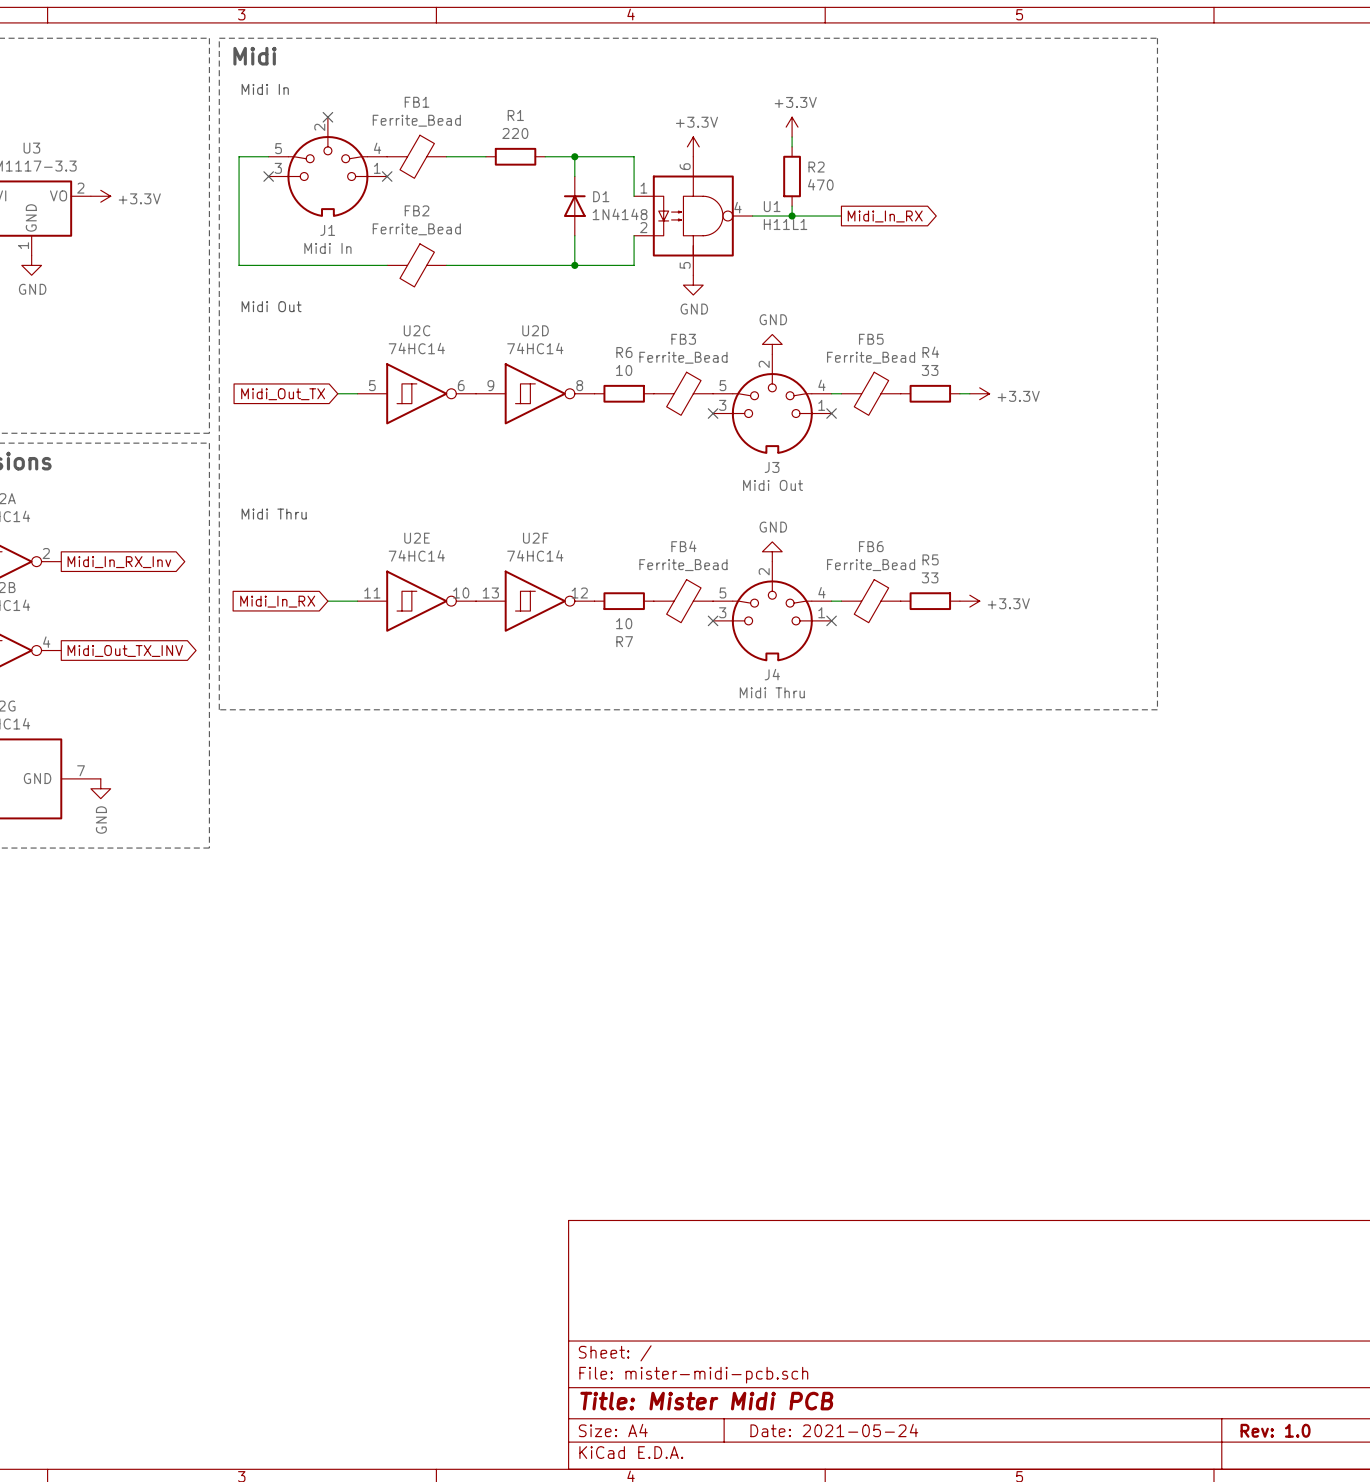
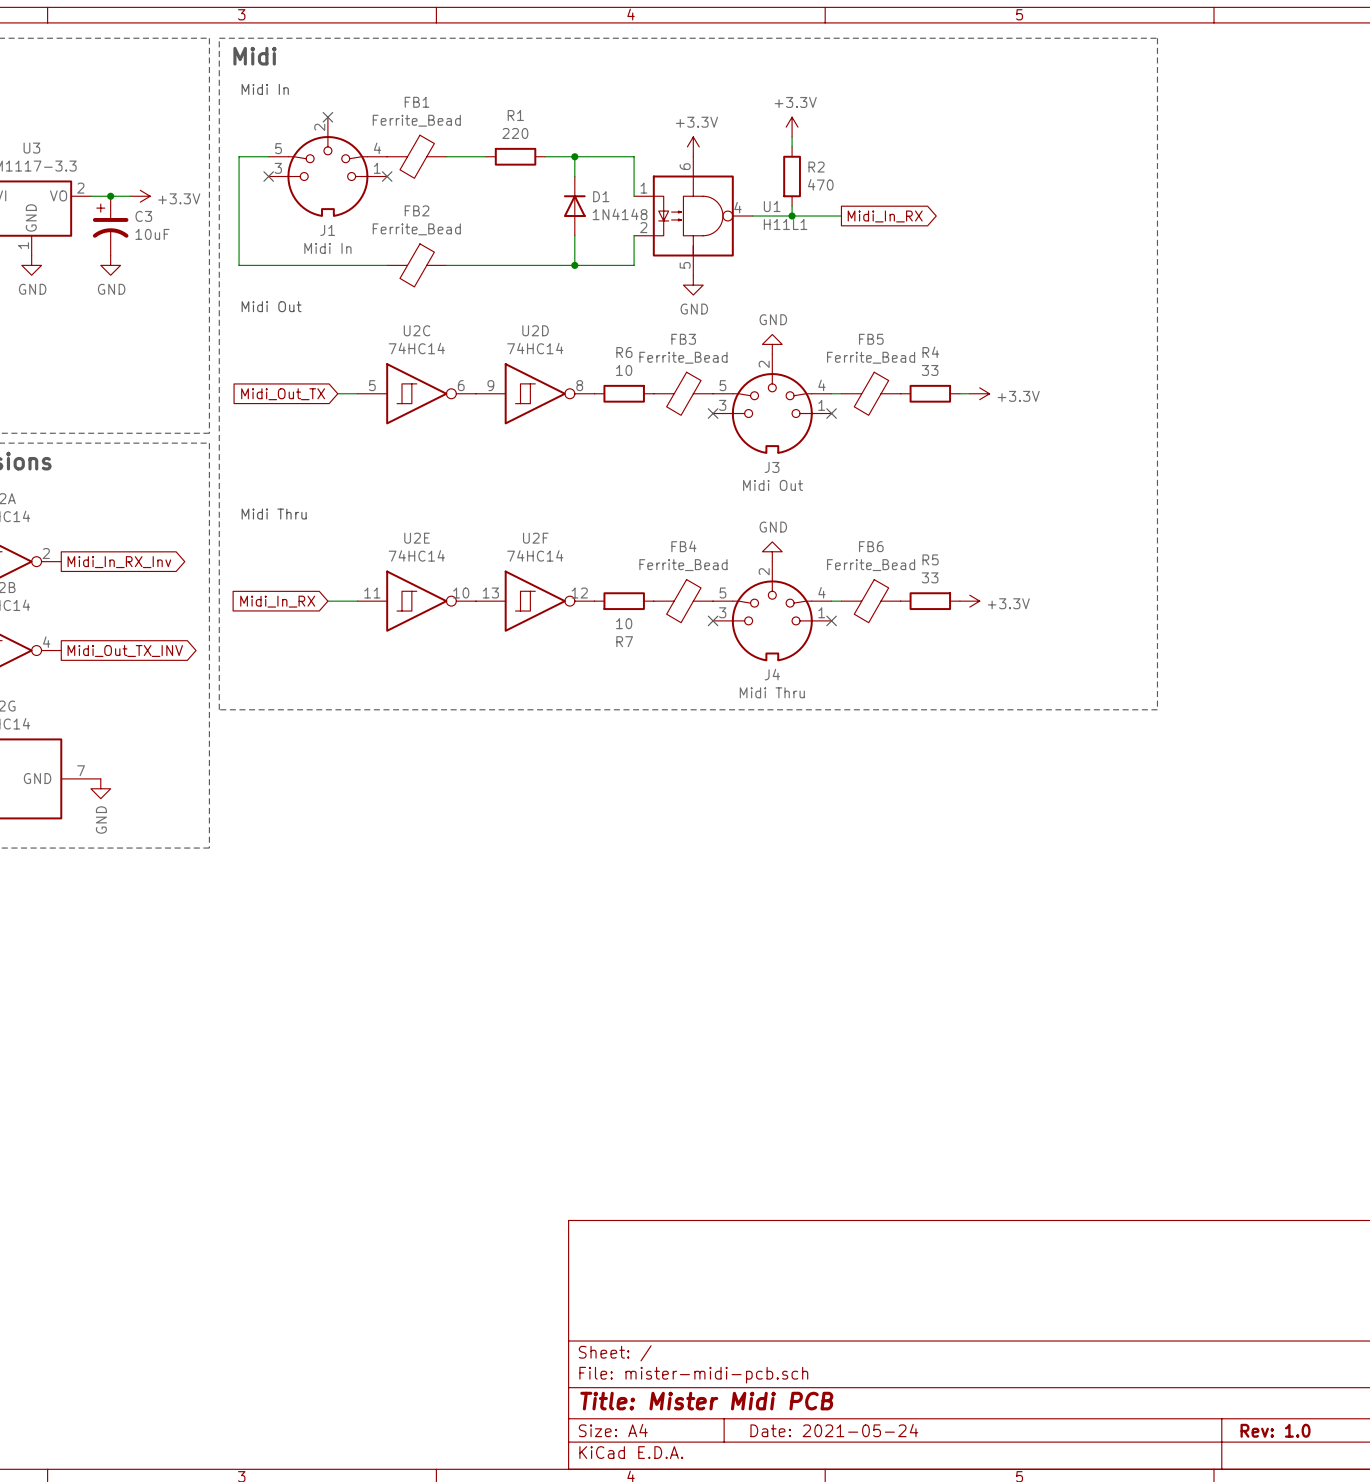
power symbol position: +3.3V (100, 196) -> +3.3V (140, 196)
junction: none -> (110, 196)
C3: none -> 10uF (110, 225)
power symbol: none -> GND (110, 265)

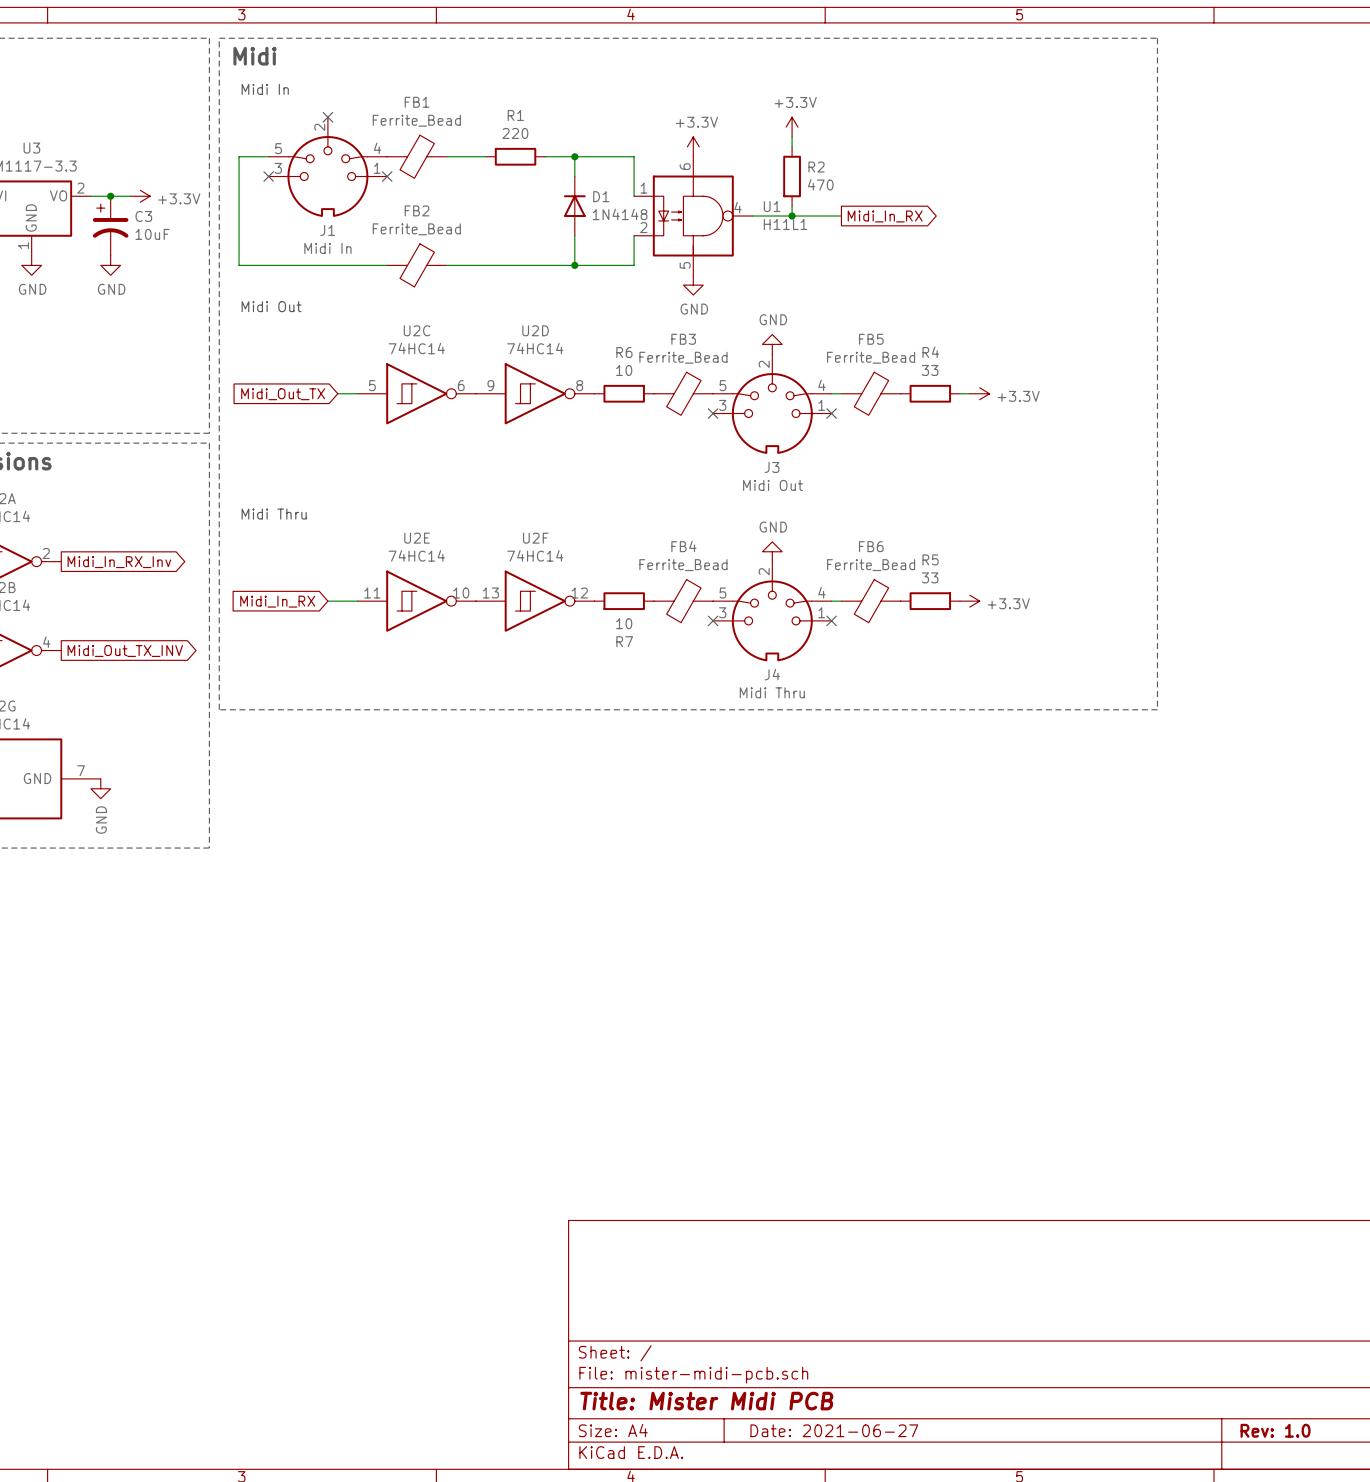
title block: Date: 2021-05-24 (834, 1430) -> Date: 2021-06-27 (834, 1430)

